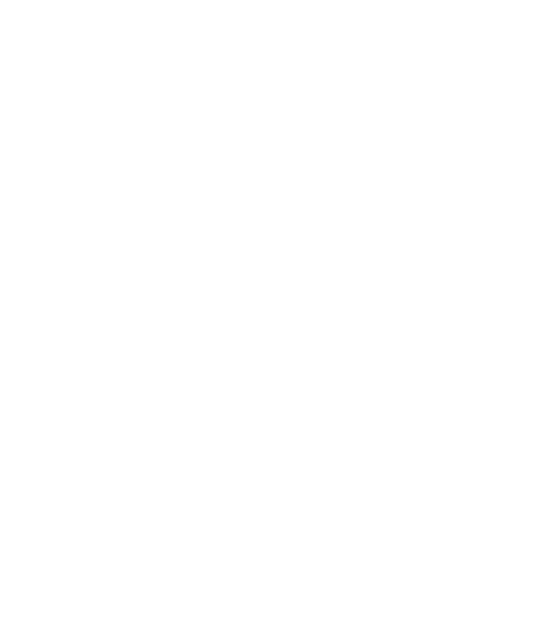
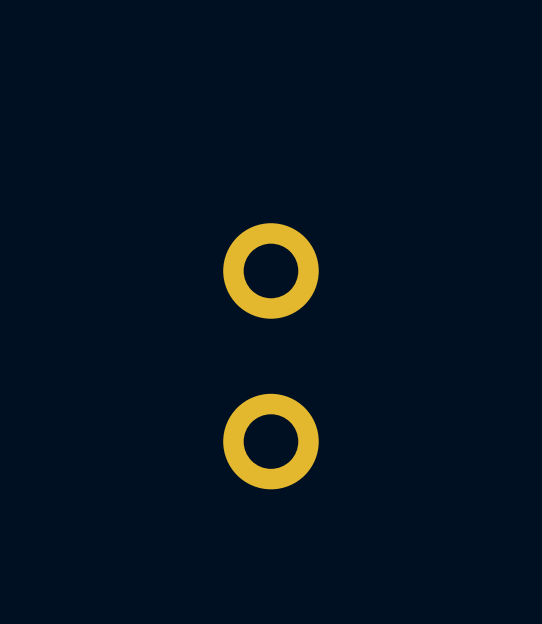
part: none -> (270, 356)

